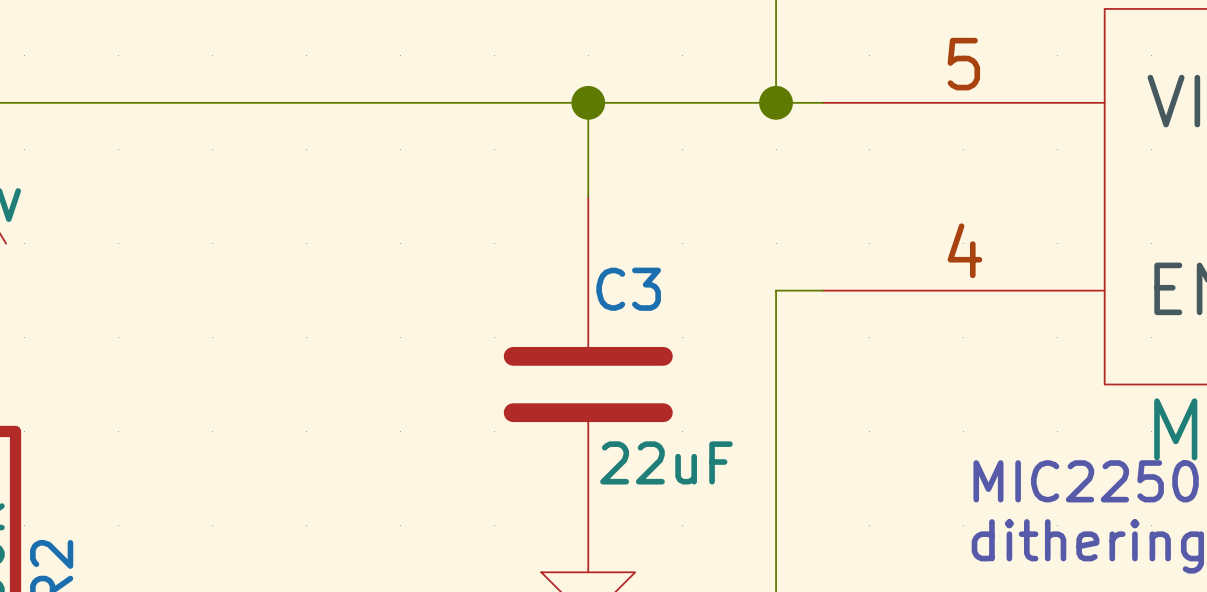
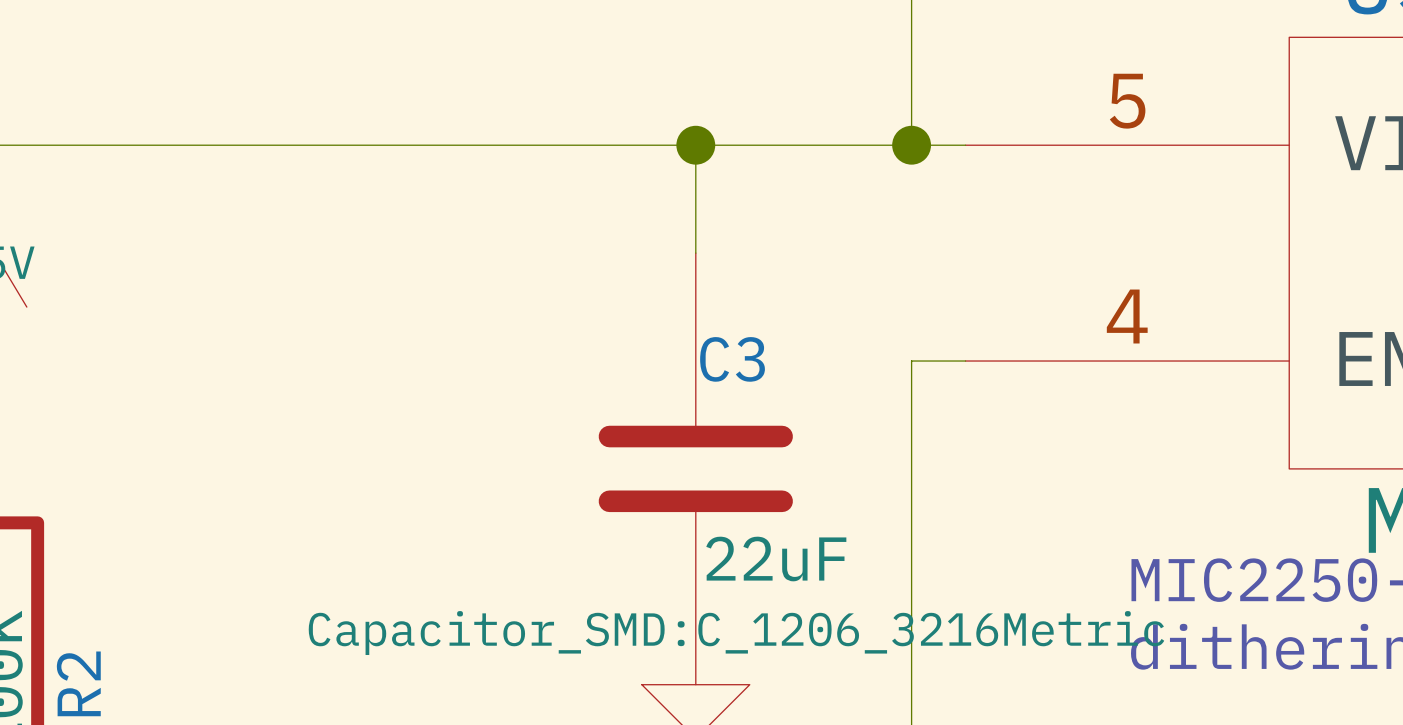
C3 text: none -> Capacitor_SMD:C_1206_3216Metric (736, 633)

